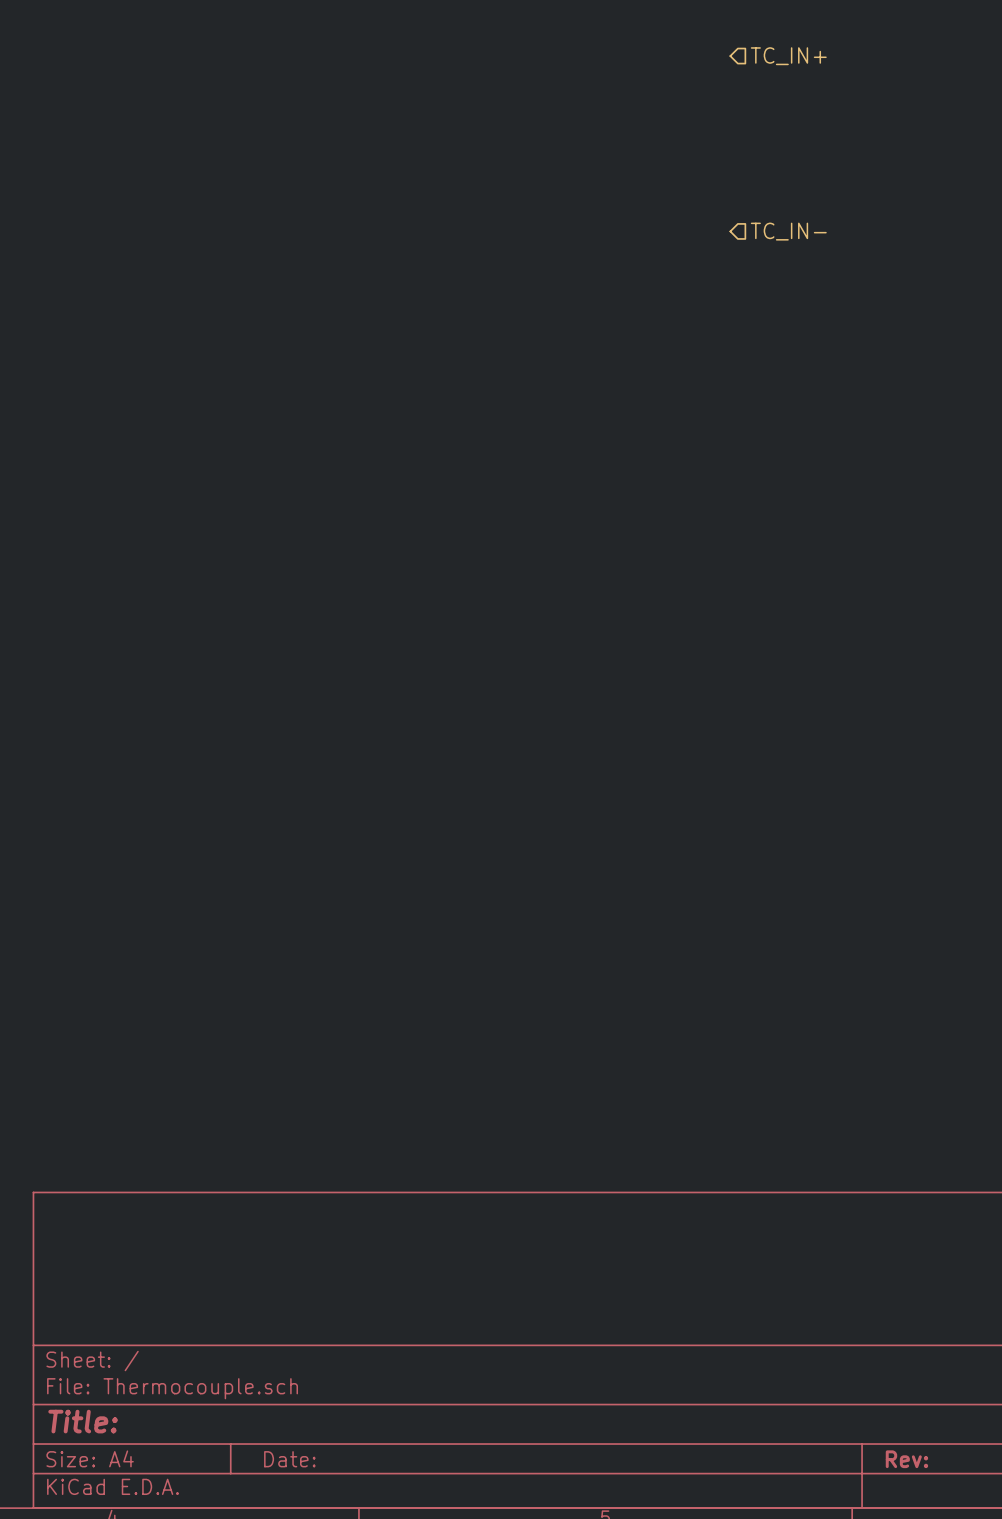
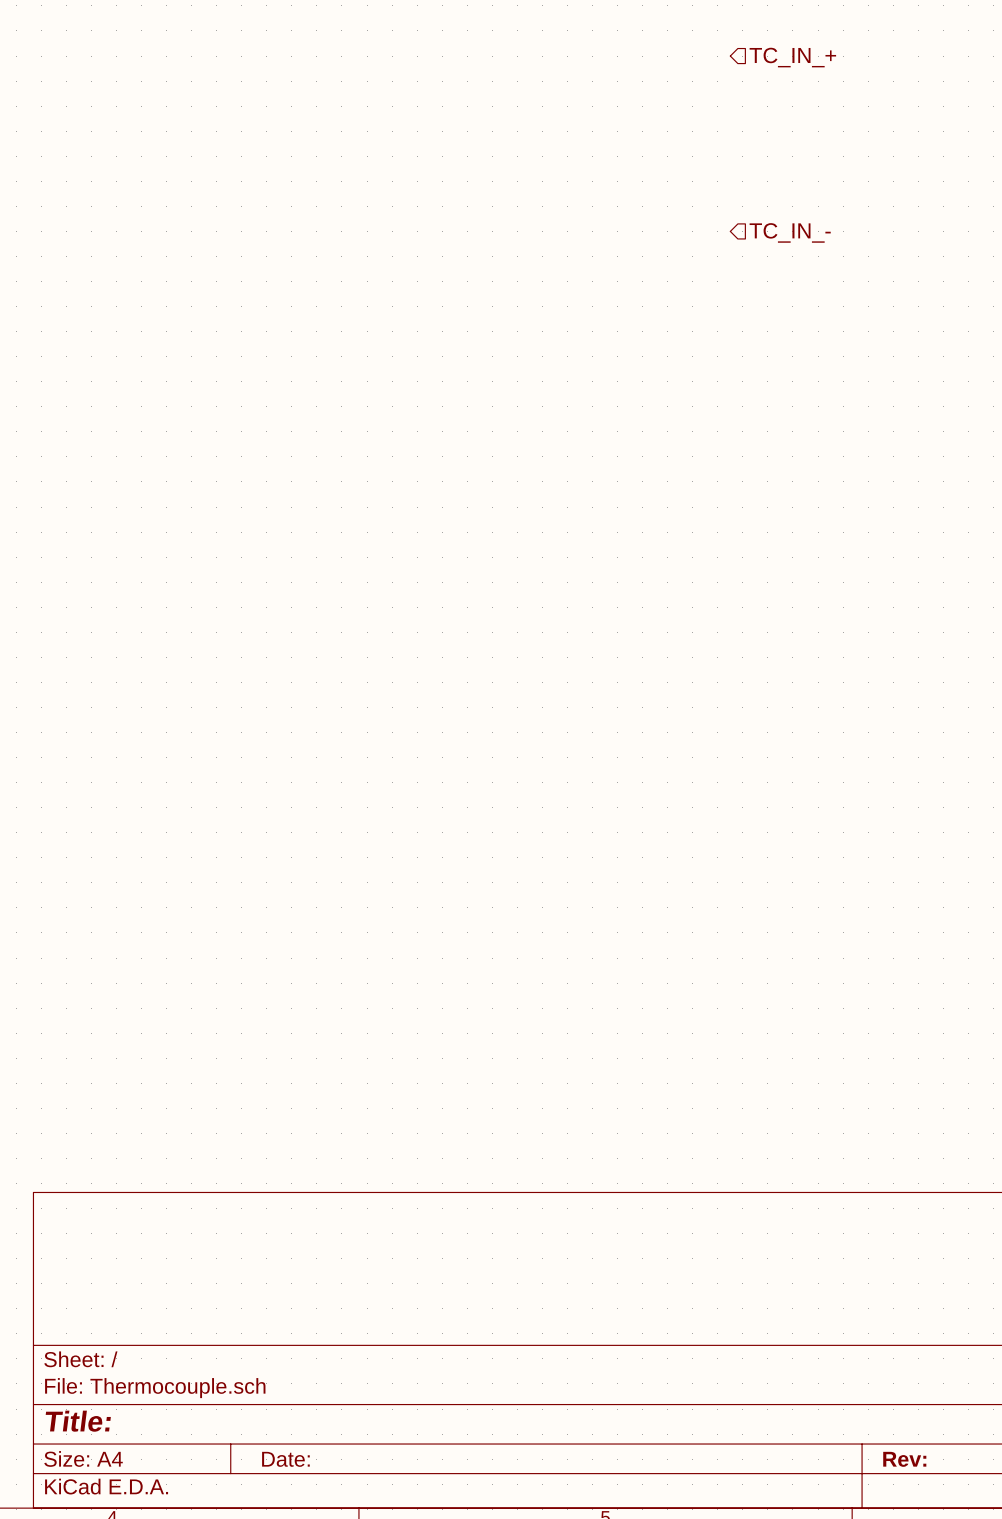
hierarchical label: TC_IN+ (788, 56) -> TC_IN_+ (792, 57)
hierarchical label: TC_IN- (788, 231) -> TC_IN_- (790, 232)

